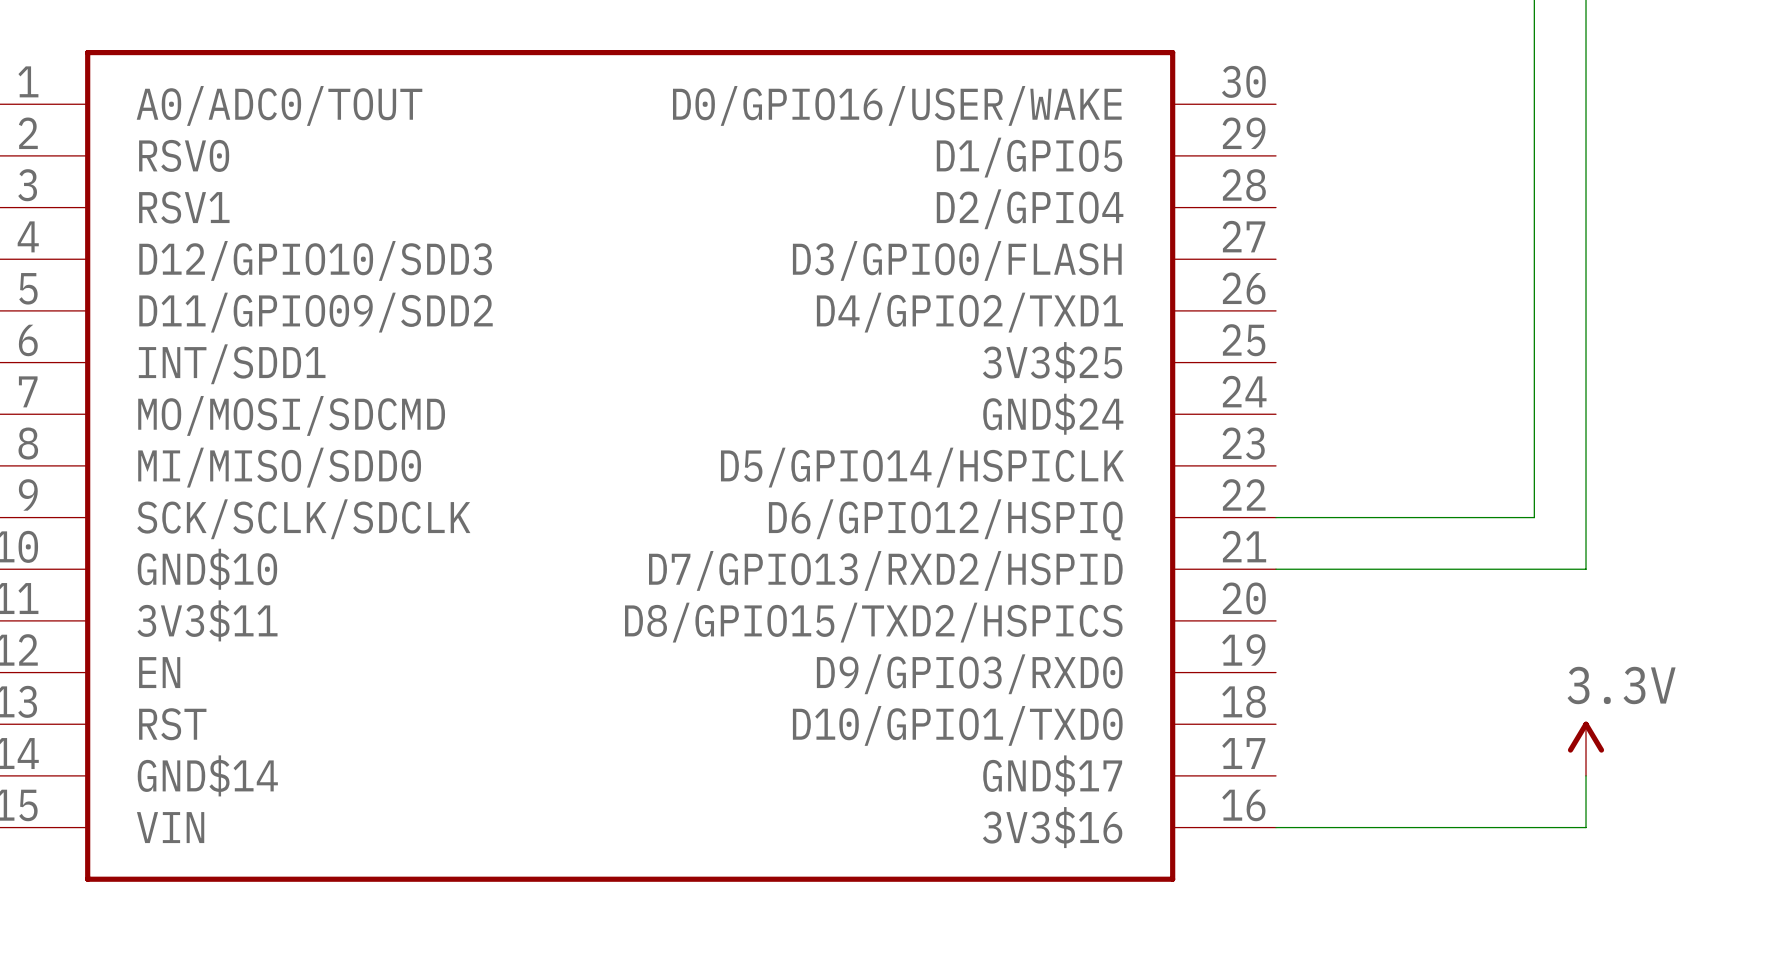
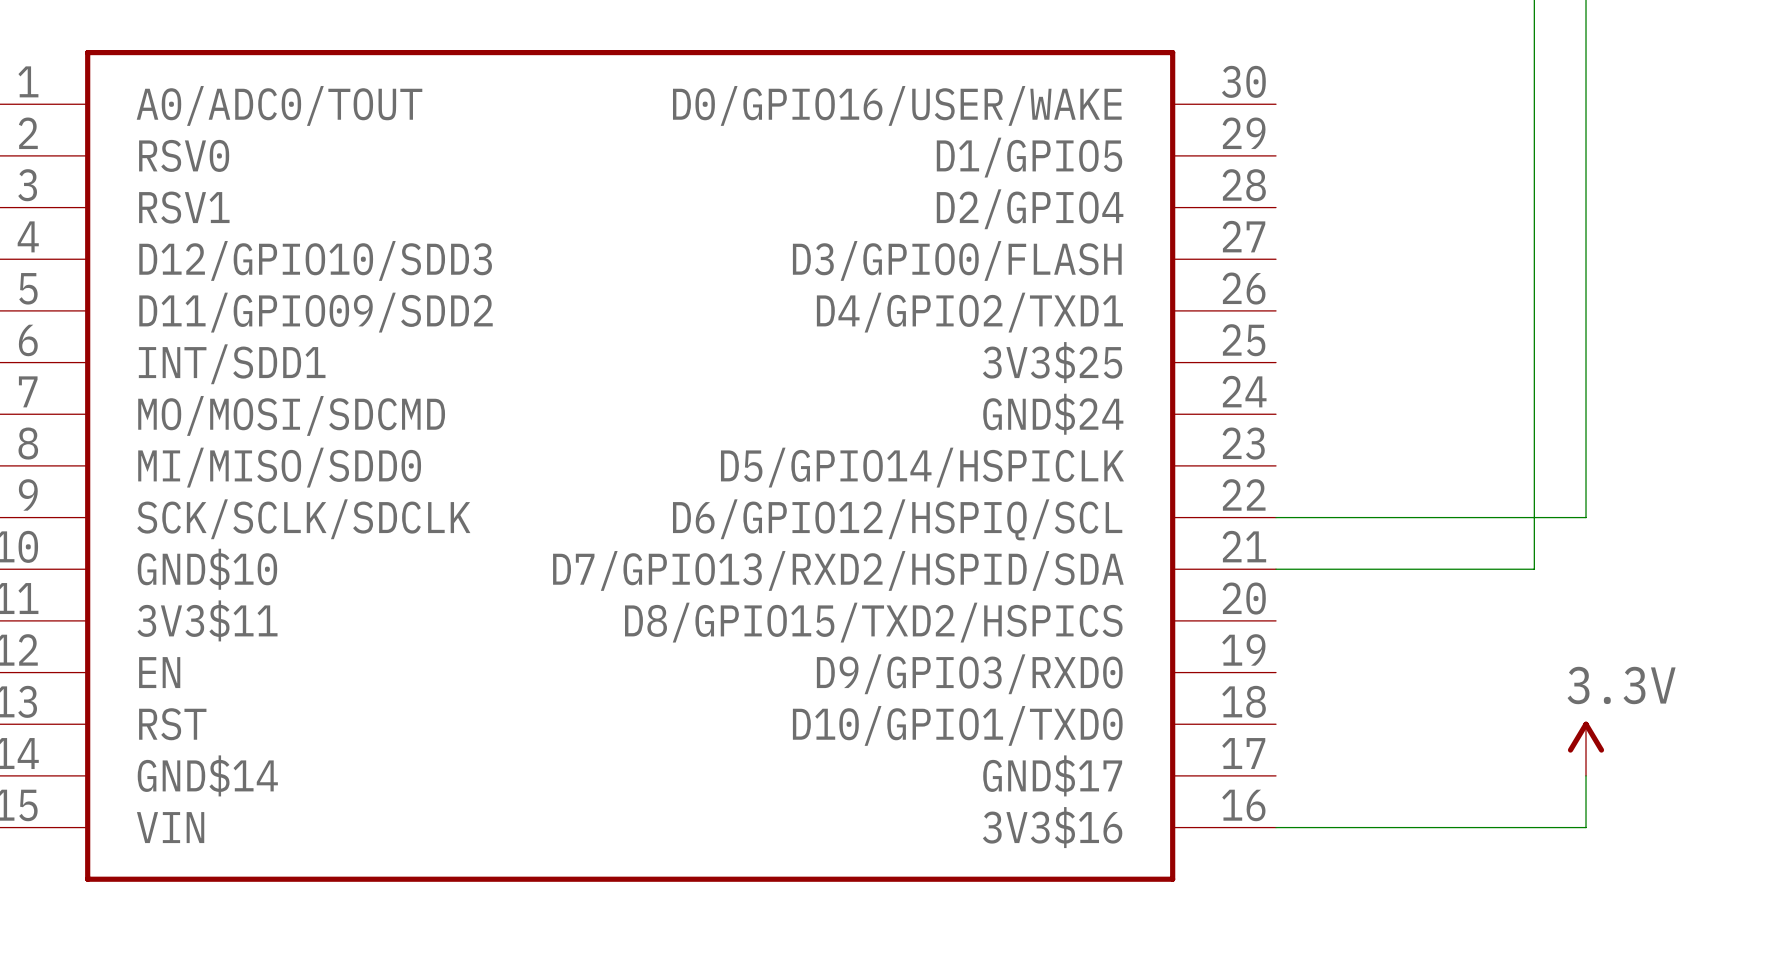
wire: (1586, 517) (1586, 569) (1534, 569) -> (1586, 517) (1534, 517) (1534, 569)
part pin name: D6/GPIO12/HSPIQ (945, 519) -> D6/GPIO12/HSPIQ/SCL (897, 519)
part pin name: D7/GPIO13/RXD2/HSPID (885, 570) -> D7/GPIO13/RXD2/HSPID/SDA (838, 570)

